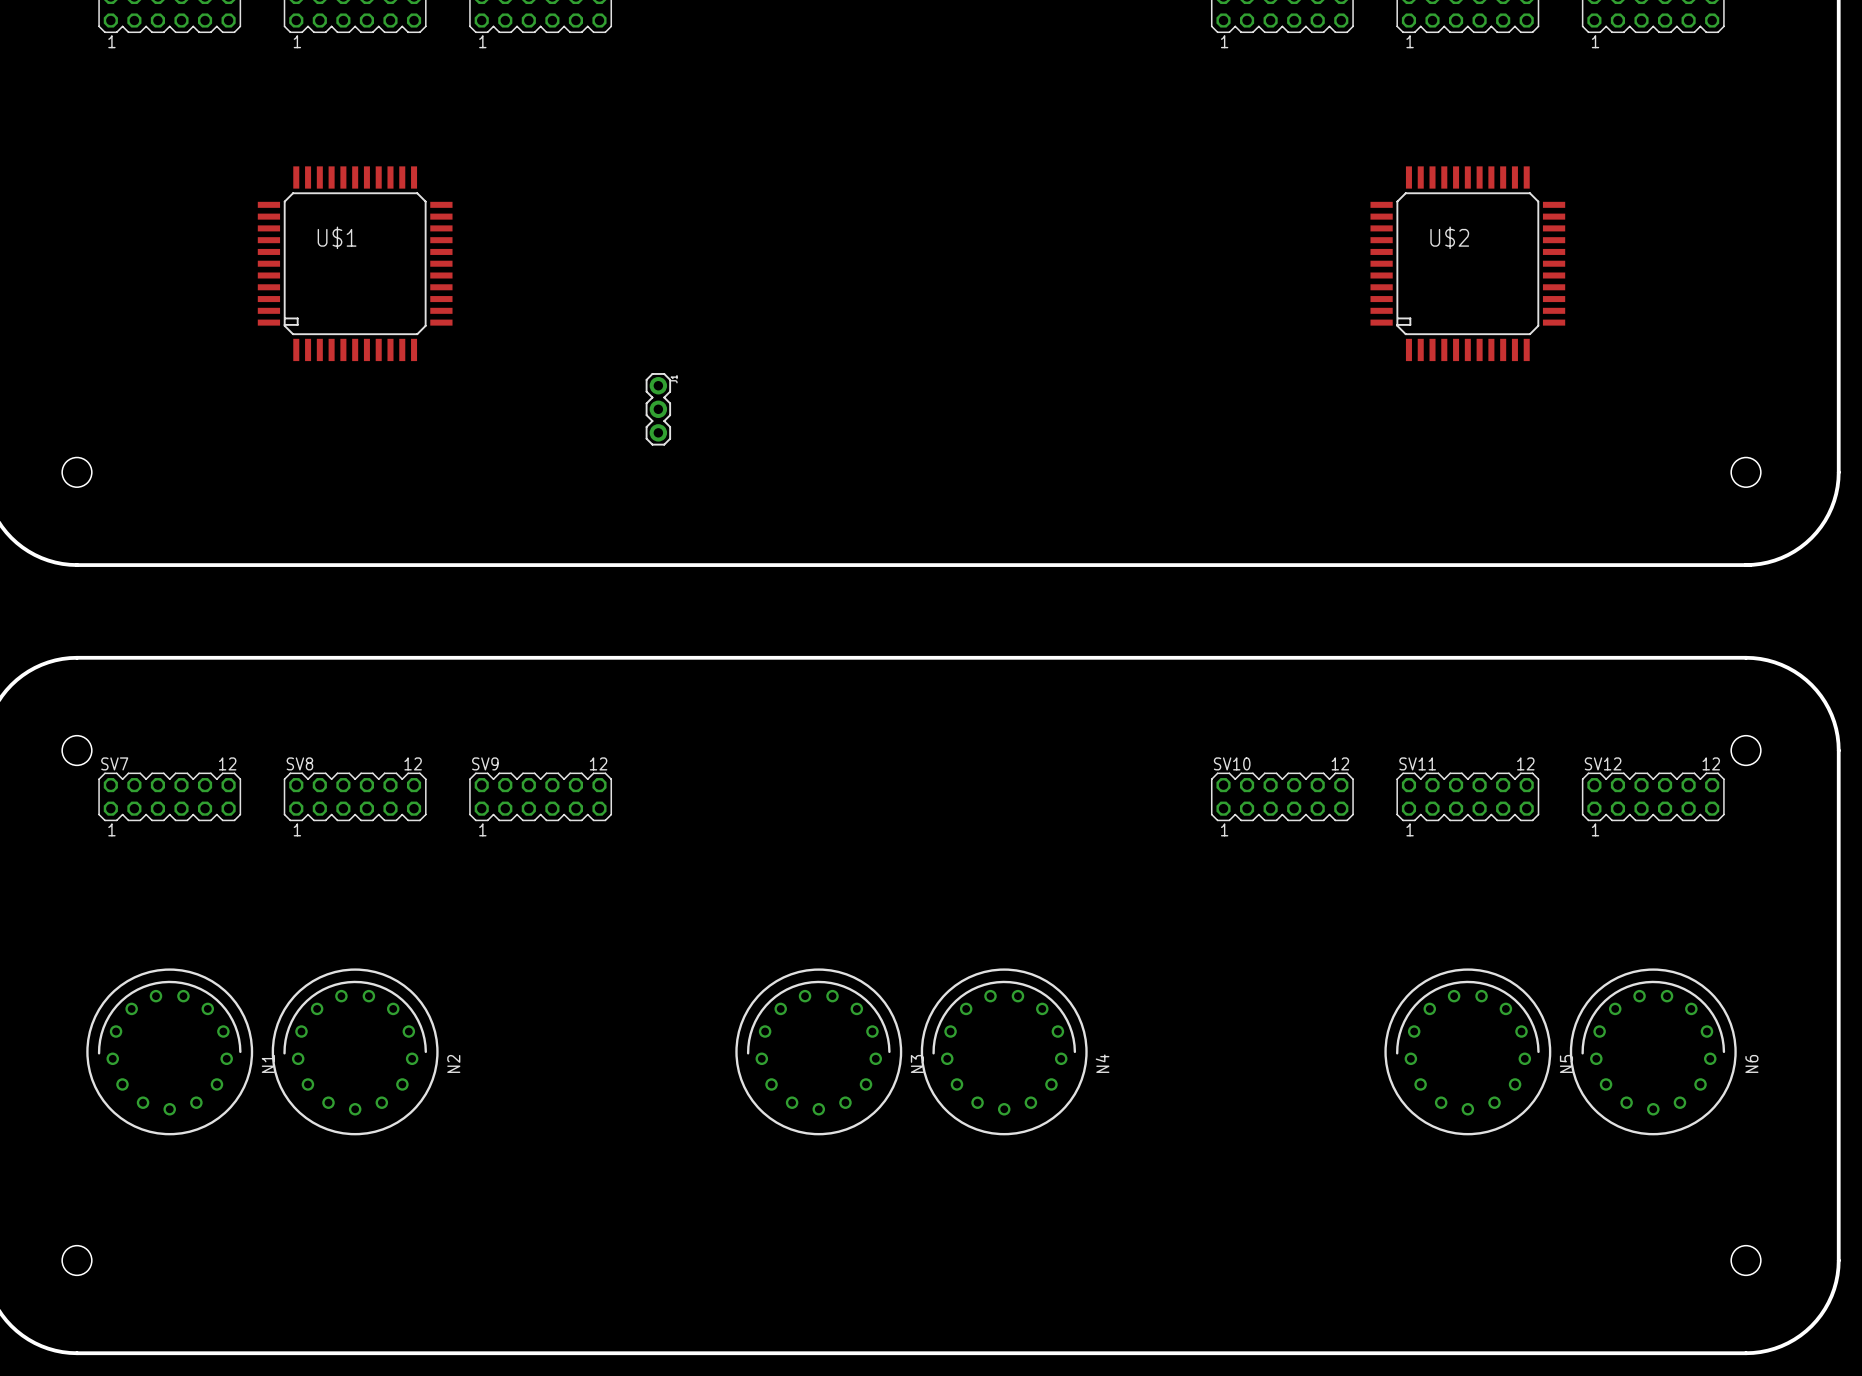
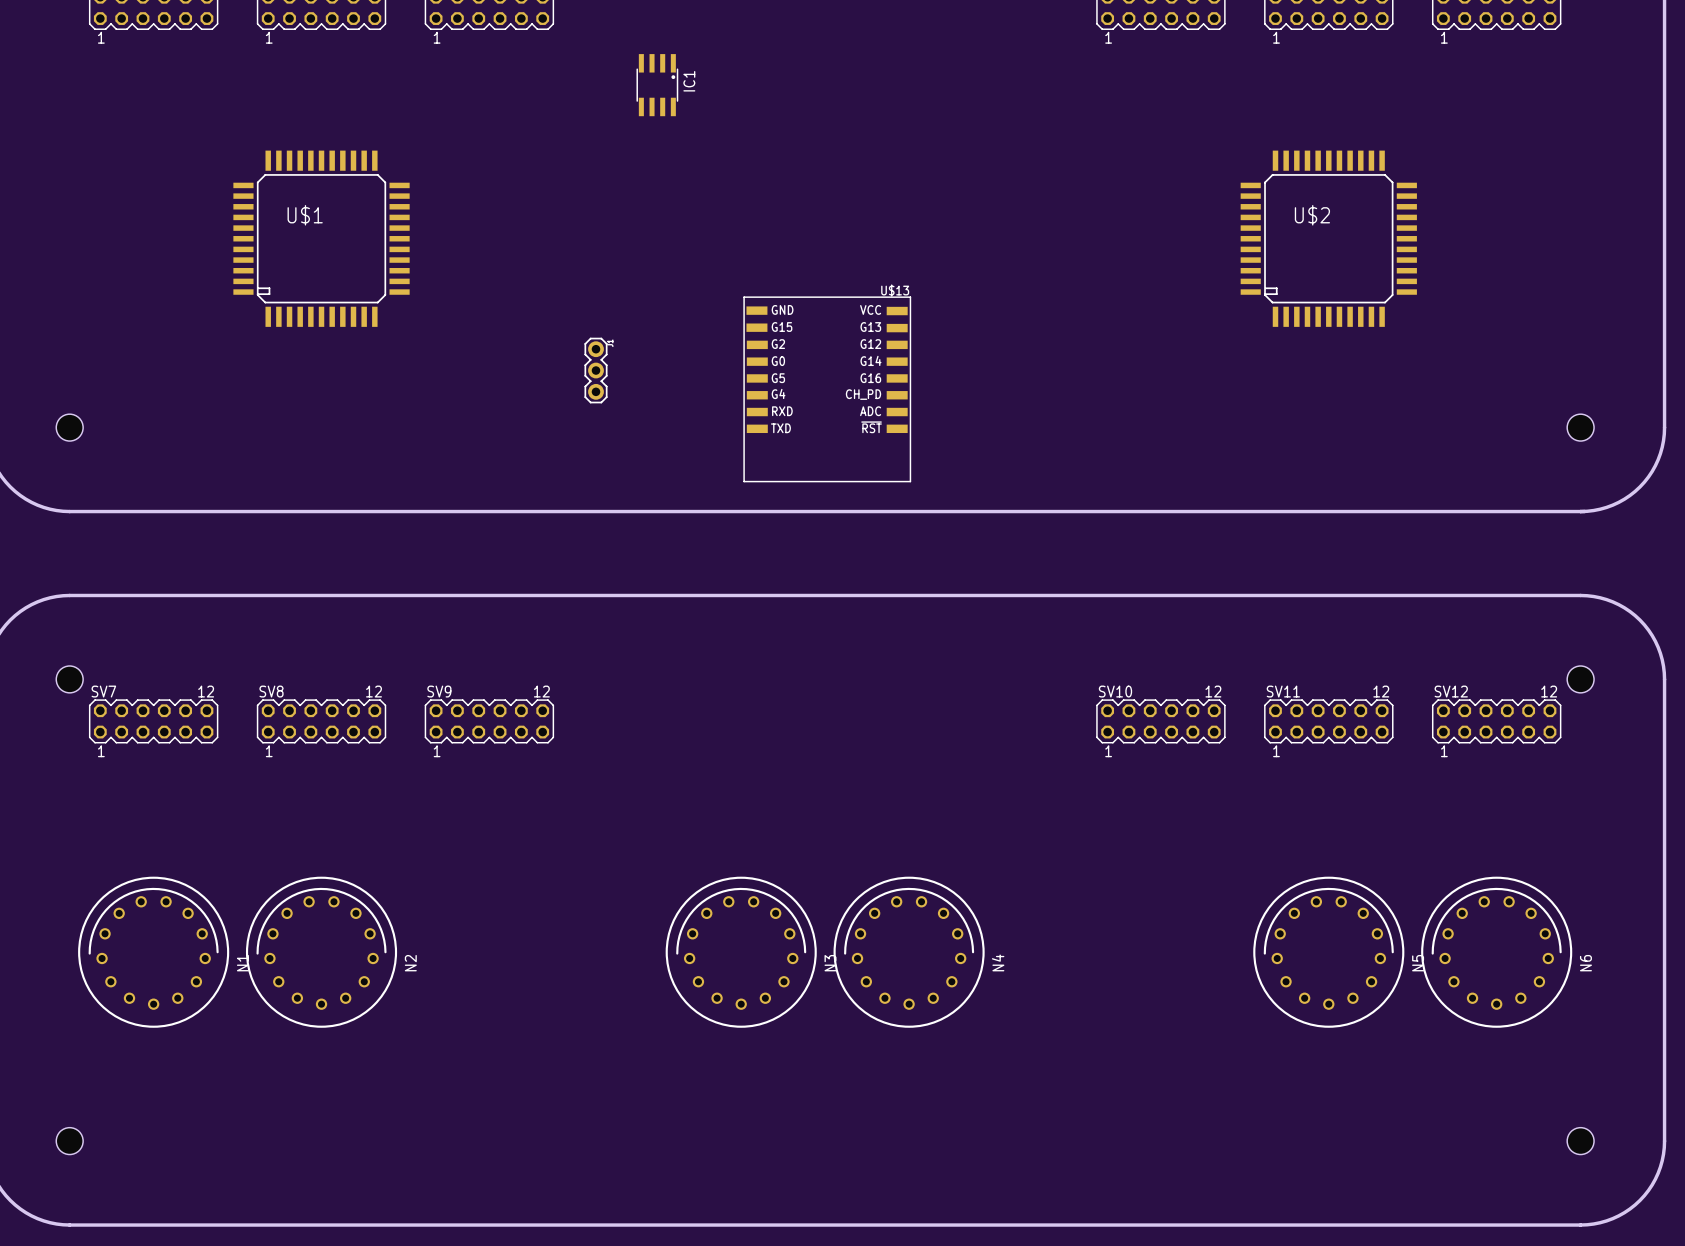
IC1: none -> (657, 85)
U$13: none -> (827, 389)

